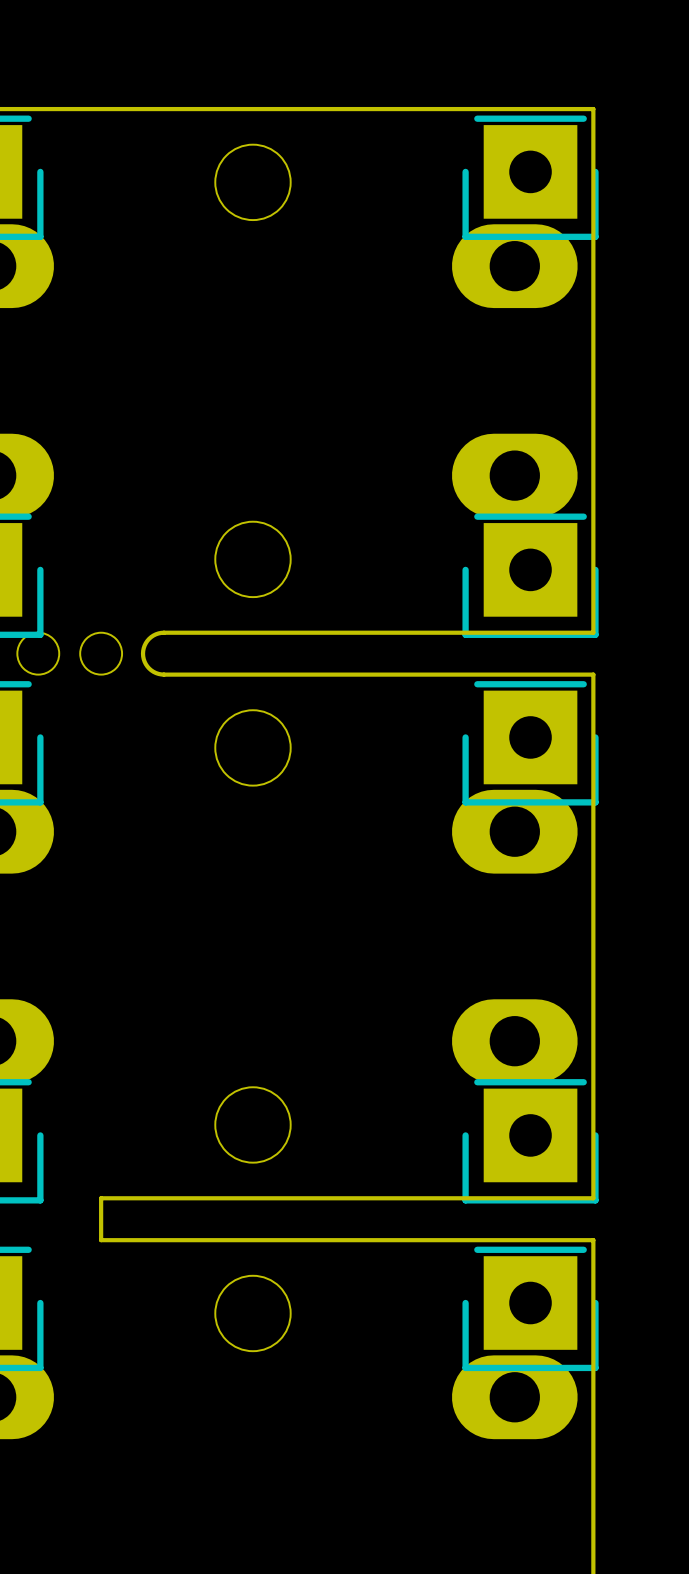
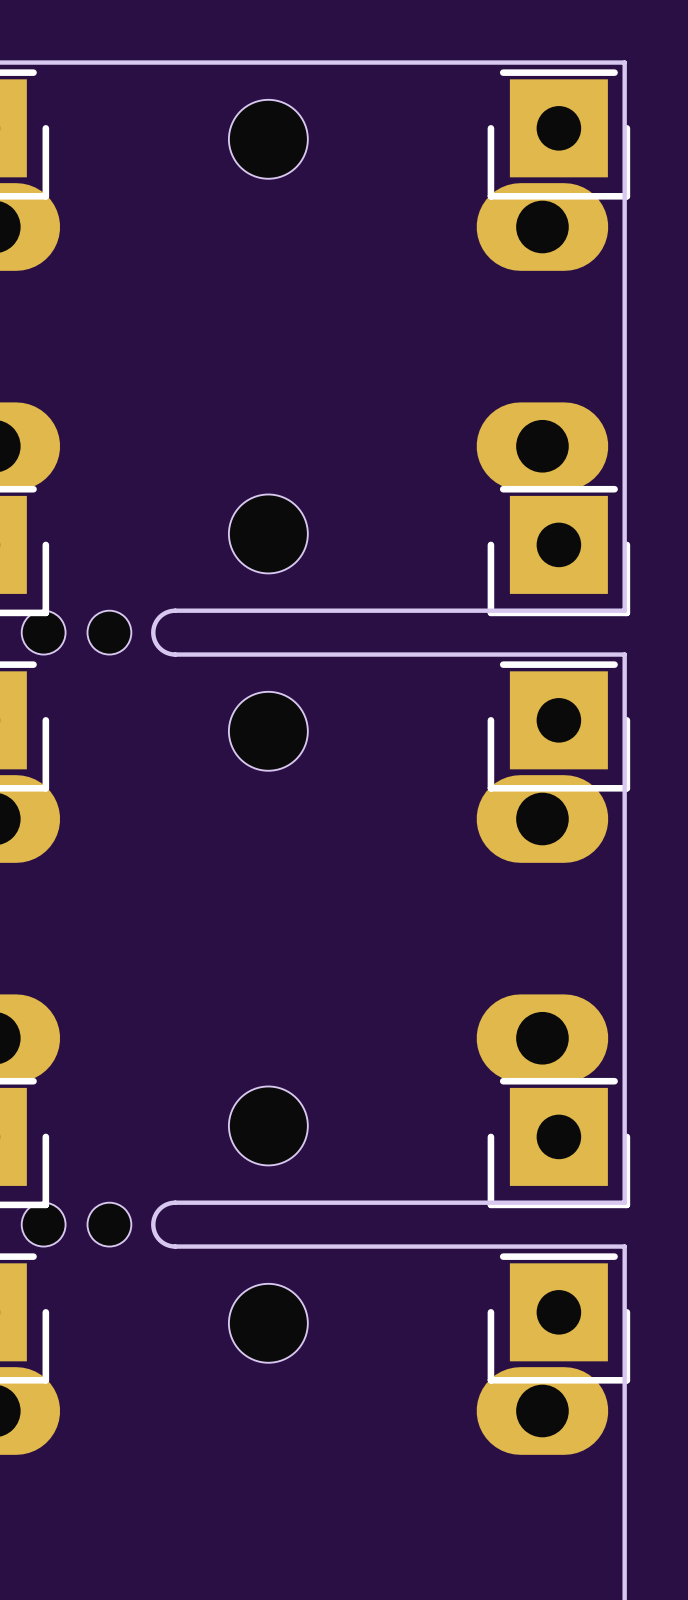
board edge: (163, 1198) (101, 1198) (101, 1240) (163, 1240) -> (175, 1202) (166, 1204) (159, 1209) (154, 1216) (153, 1224) (154, 1233) (159, 1240) (166, 1244) (175, 1246)
part: none -> (43, 1224)
part: none -> (109, 1224)

